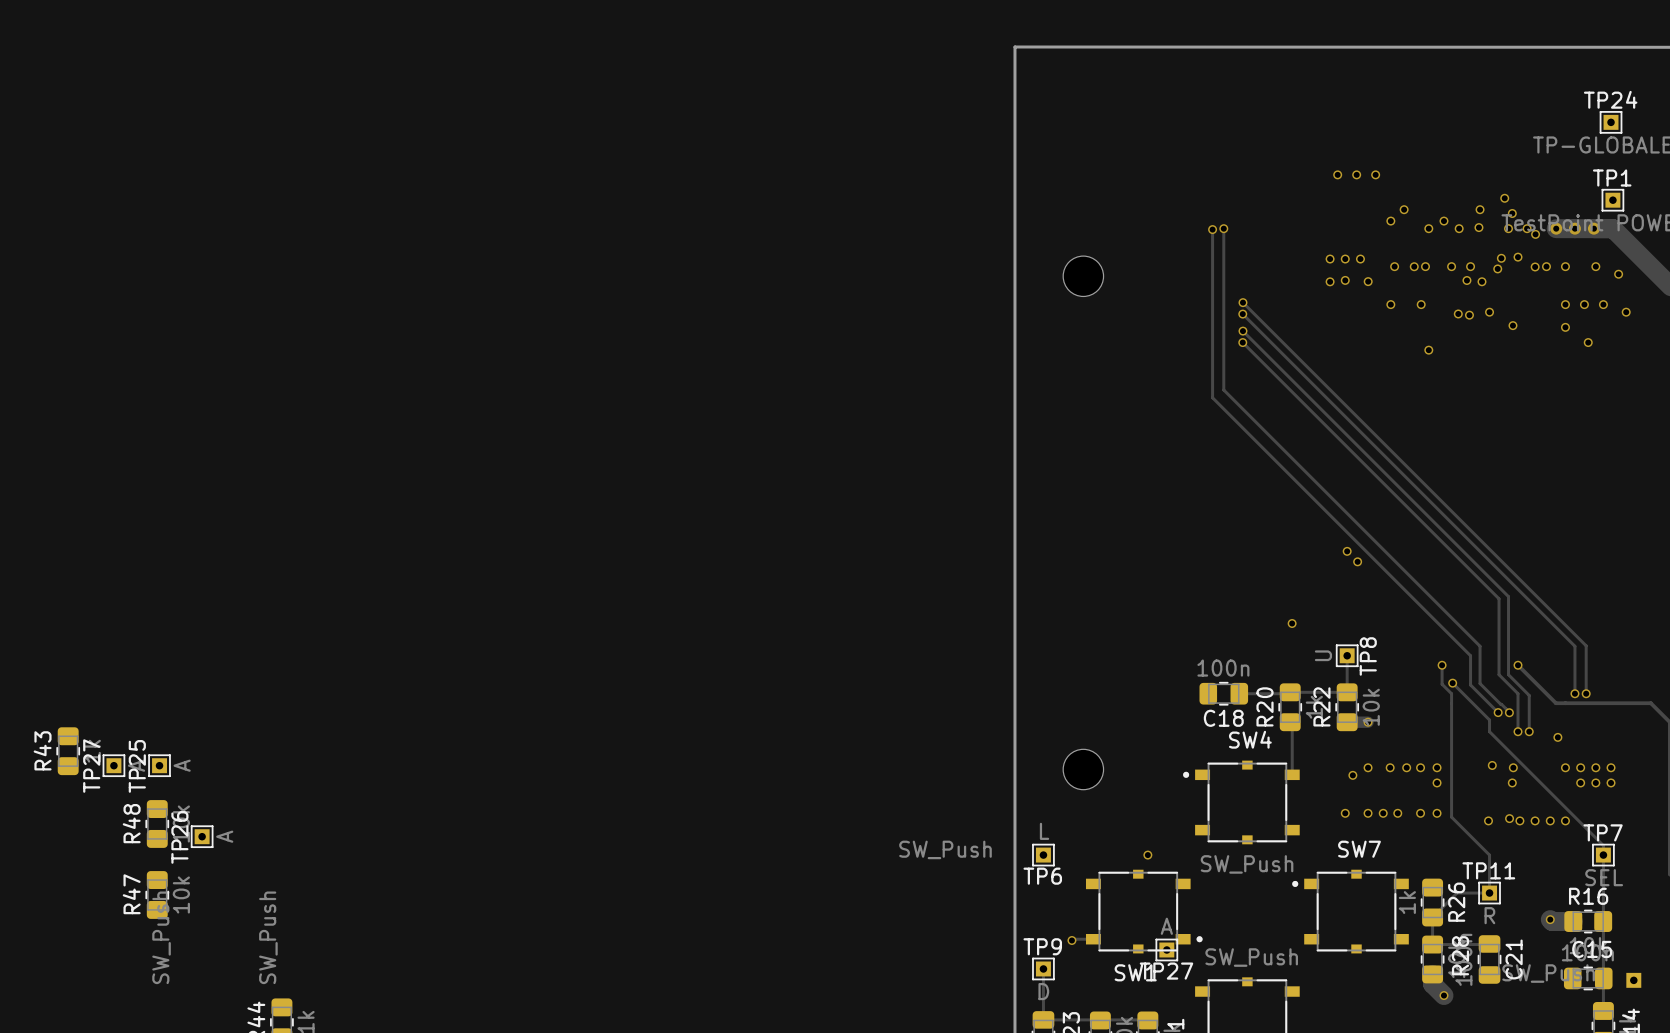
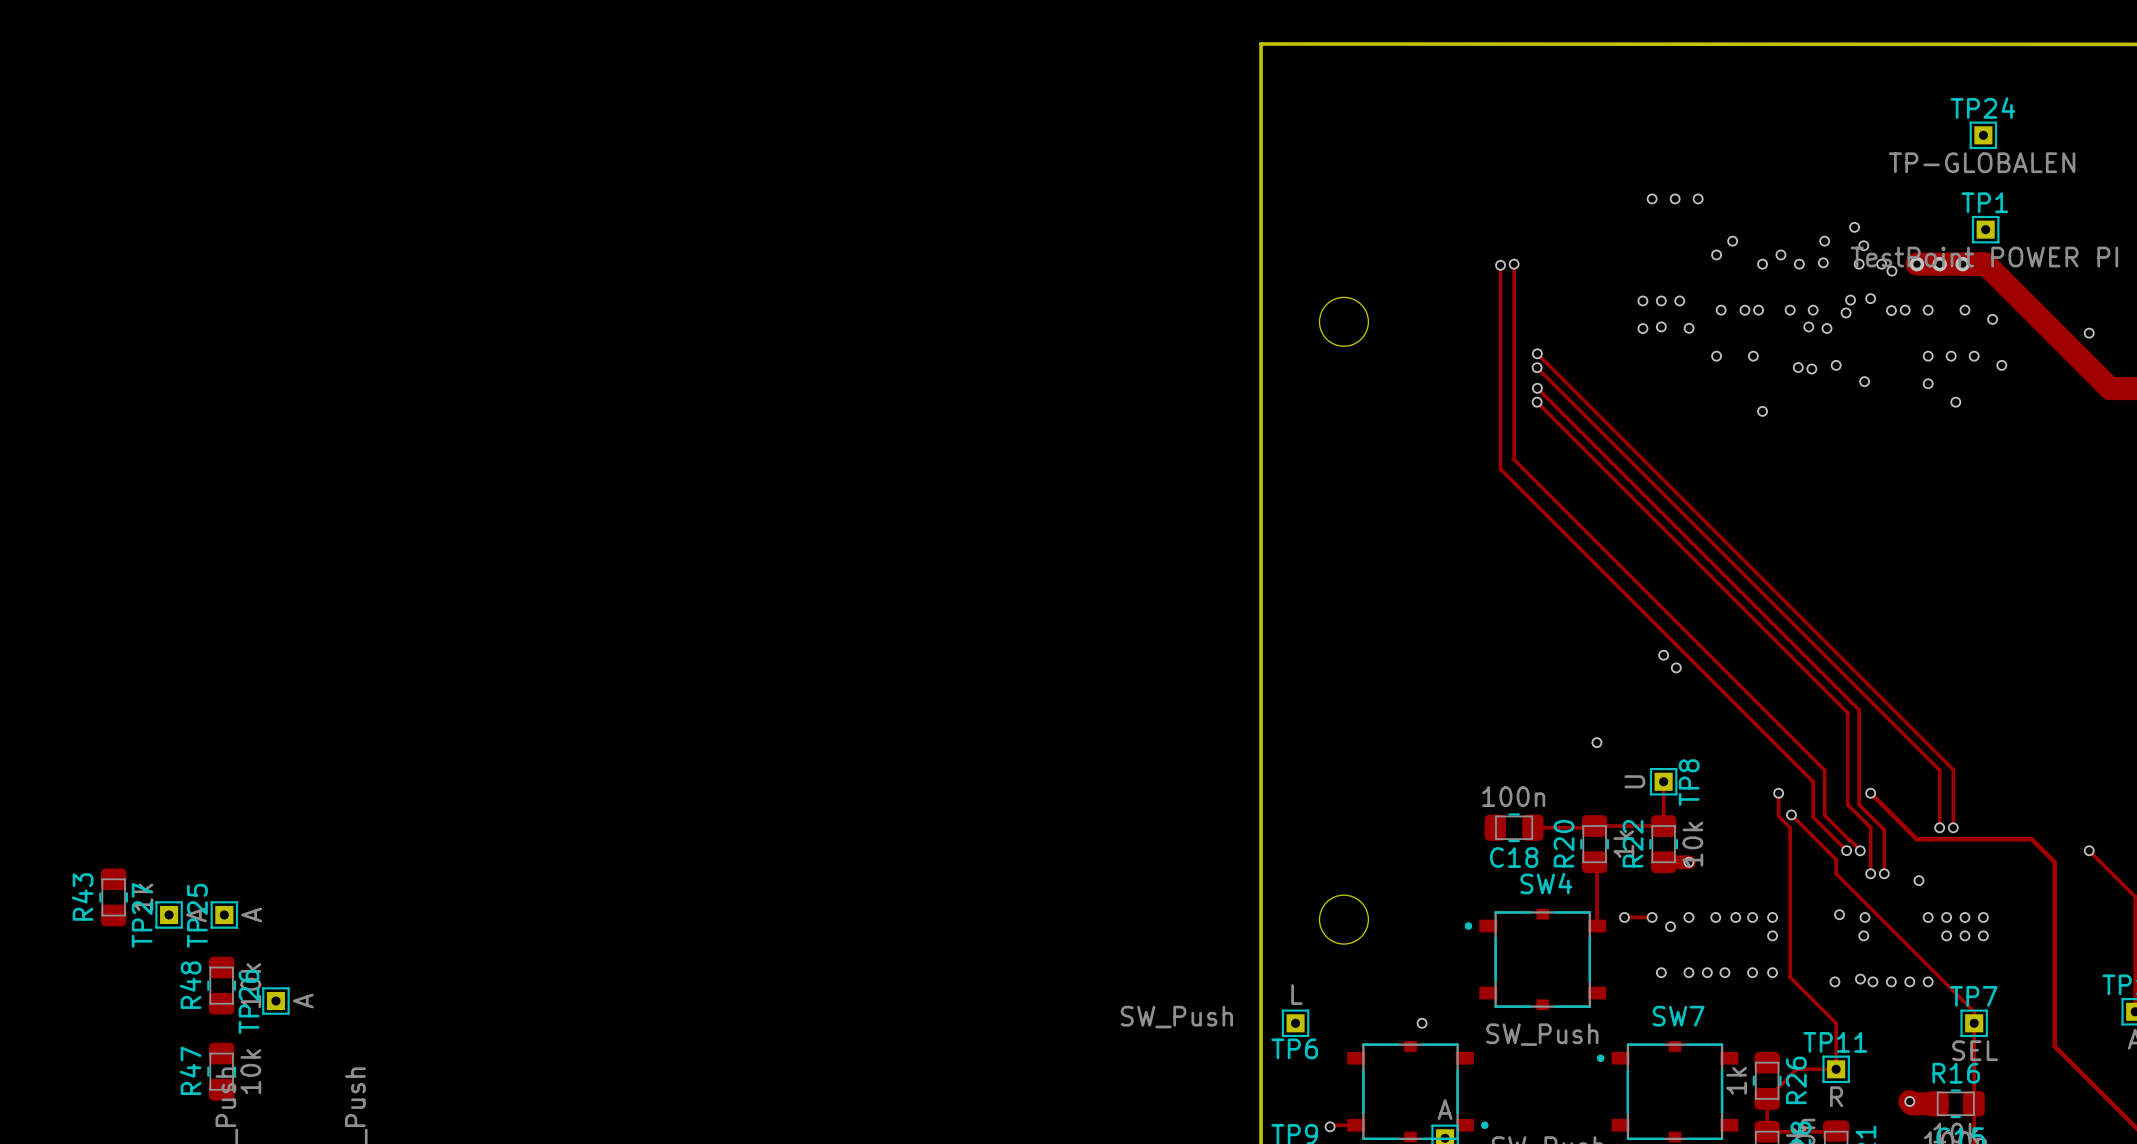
track: none -> (1624, 917) (1652, 917)
via: none -> (1624, 917)
via: none -> (1652, 917)

